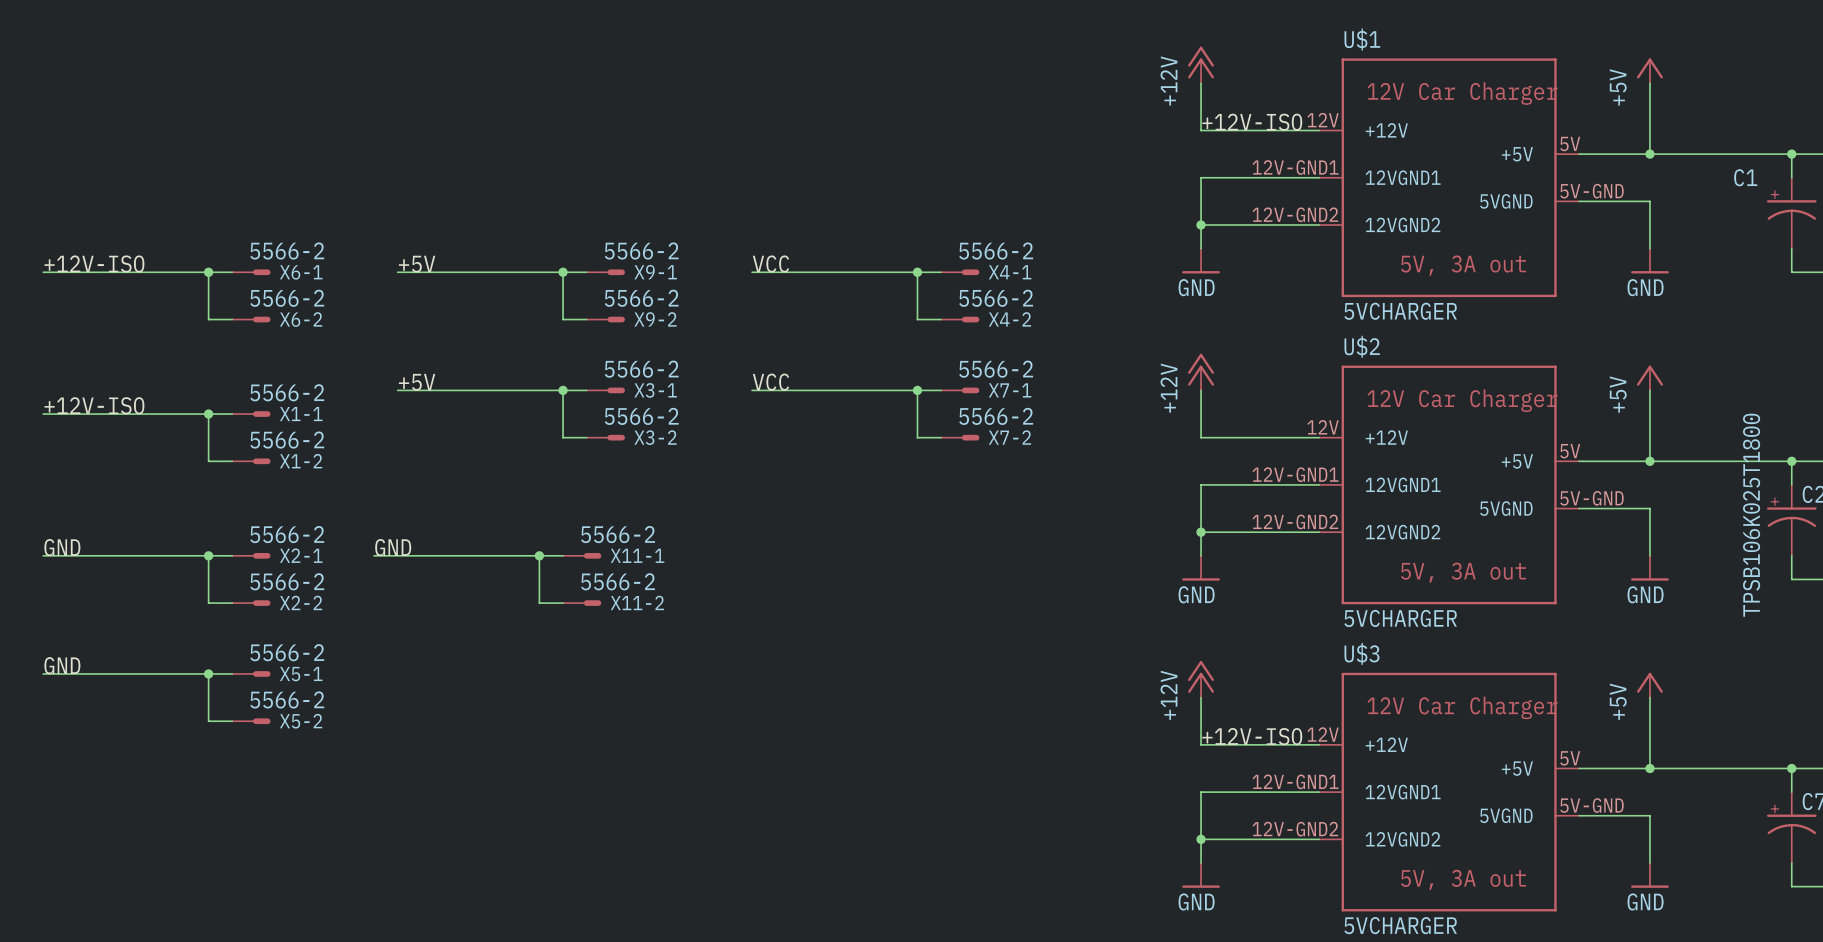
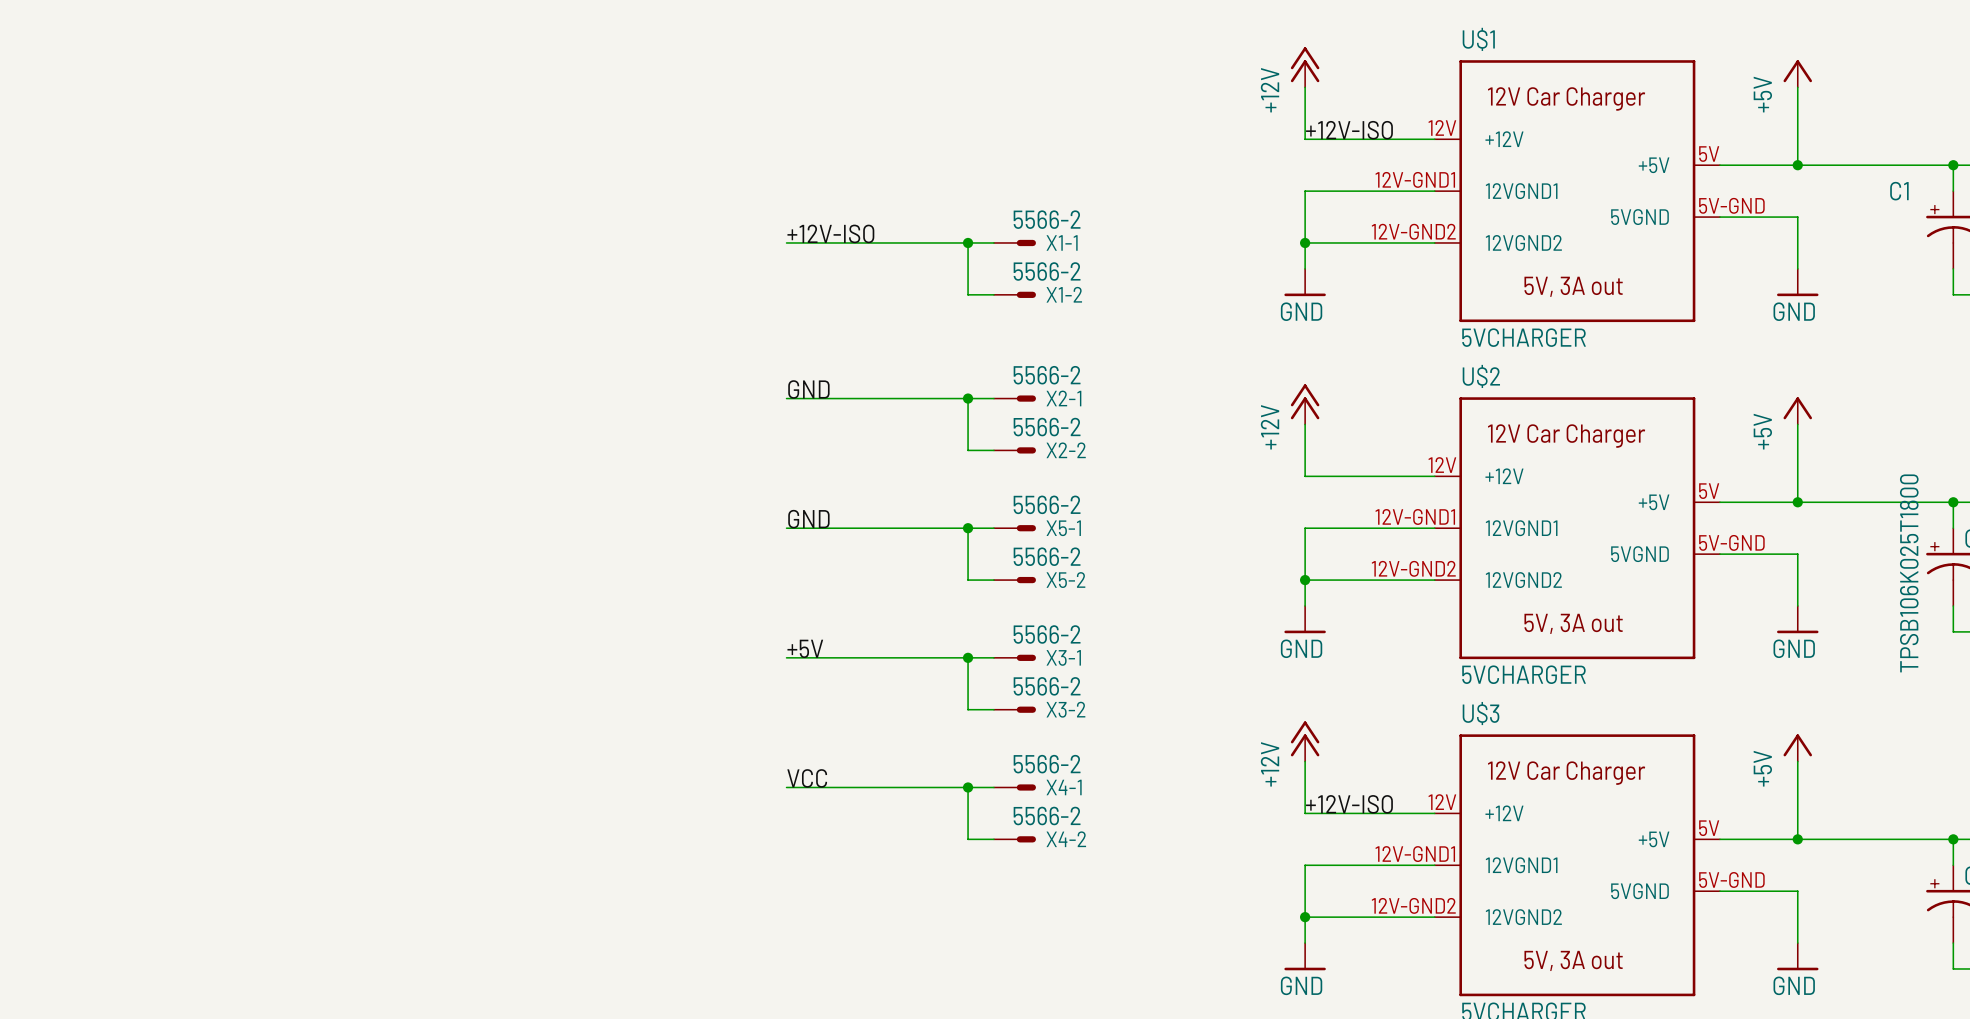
label: none -> +12V-ISO (830, 233)
wire: none -> (786, 242) (993, 242)
junction: none -> (968, 242)
label: +12V-ISO (94, 264) -> none
label: +5V (417, 264) -> none
label: VCC (770, 264) -> none
wire: (43, 272) (232, 272) -> none
wire: (208, 272) (208, 319) (232, 319) -> none
junction: (208, 272) -> none
X6-1: 5566-2 (251, 272) -> none
wire: (397, 272) (586, 272) -> none
wire: (563, 272) (563, 319) (586, 319) -> none
junction: (563, 272) -> none
X9-1: 5566-2 (605, 272) -> none
wire: (752, 272) (893, 272) -> (968, 242) (968, 294)
junction: (917, 272) -> none
wire: (941, 272) (917, 272) (917, 319) (941, 319) -> none
X4-1 position: (960, 272) -> (1014, 787)
X6-2: 5566-2 (251, 319) -> none
X9-2: 5566-2 (605, 319) -> none
X4-2 position: (960, 319) -> (1014, 839)
label: none -> GND (808, 389)
label: +5V (417, 382) -> none
label: VCC (770, 382) -> none
wire: (397, 390) (586, 390) -> none
wire: (563, 390) (563, 437) (586, 437) -> none
junction: (563, 390) -> none
X3-1 position: (605, 390) -> (1014, 657)
wire: (752, 390) (941, 390) -> (786, 398) (993, 398)
wire: (917, 390) (917, 437) (941, 437) -> (968, 398) (968, 450) (993, 450)
junction position: (917, 390) -> (968, 398)
X7-1: 5566-2 (960, 390) -> none
label: +12V-ISO (94, 405) -> none
wire: (43, 414) (232, 414) -> none
wire: (208, 414) (208, 461) (232, 461) -> none
junction: (208, 414) -> none
X1-1 position: (251, 414) -> (1014, 242)
X3-2 position: (605, 437) -> (1014, 709)
X7-2: 5566-2 (960, 437) -> none
X1-2 position: (251, 461) -> (1014, 294)
label: none -> GND (808, 519)
wire: none -> (786, 528) (993, 528)
wire: none -> (968, 528) (968, 580) (993, 580)
junction: none -> (968, 528)
label: GND (62, 547) -> none
label: GND (393, 547) -> none
wire: (43, 555) (232, 555) -> none
wire: (208, 555) (208, 603) (232, 603) -> none
junction: (208, 555) -> none
X2-1 position: (251, 555) -> (1014, 398)
wire: (374, 555) (563, 555) -> none
wire: (539, 555) (539, 603) (563, 603) -> none
junction: (539, 555) -> none
X11-1: 5566-2 (582, 555) -> none
label: none -> +5V (805, 648)
X2-2 position: (251, 603) -> (1014, 450)
X11-2: 5566-2 (582, 603) -> none
wire: none -> (786, 657) (993, 657)
wire: none -> (968, 657) (968, 709) (993, 709)
junction: none -> (968, 657)
label: GND (62, 665) -> none
wire: (43, 673) (232, 673) -> none
wire: (208, 673) (208, 721) (232, 721) -> none
junction: (208, 673) -> none
X5-1 position: (251, 673) -> (1014, 528)
label: none -> VCC (807, 778)
X5-2 position: (251, 721) -> (1014, 580)
wire: none -> (786, 787) (993, 787)
wire: none -> (968, 787) (968, 839) (993, 839)
junction: none -> (968, 787)

